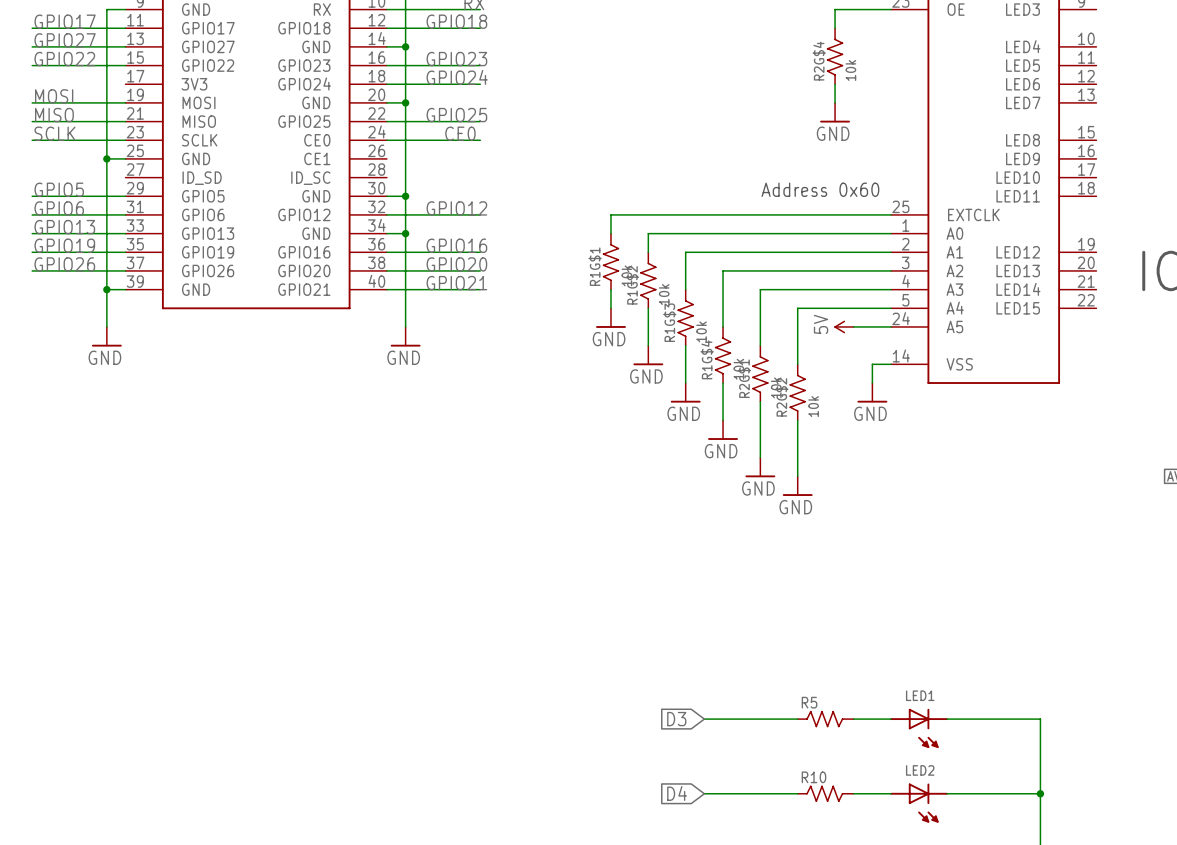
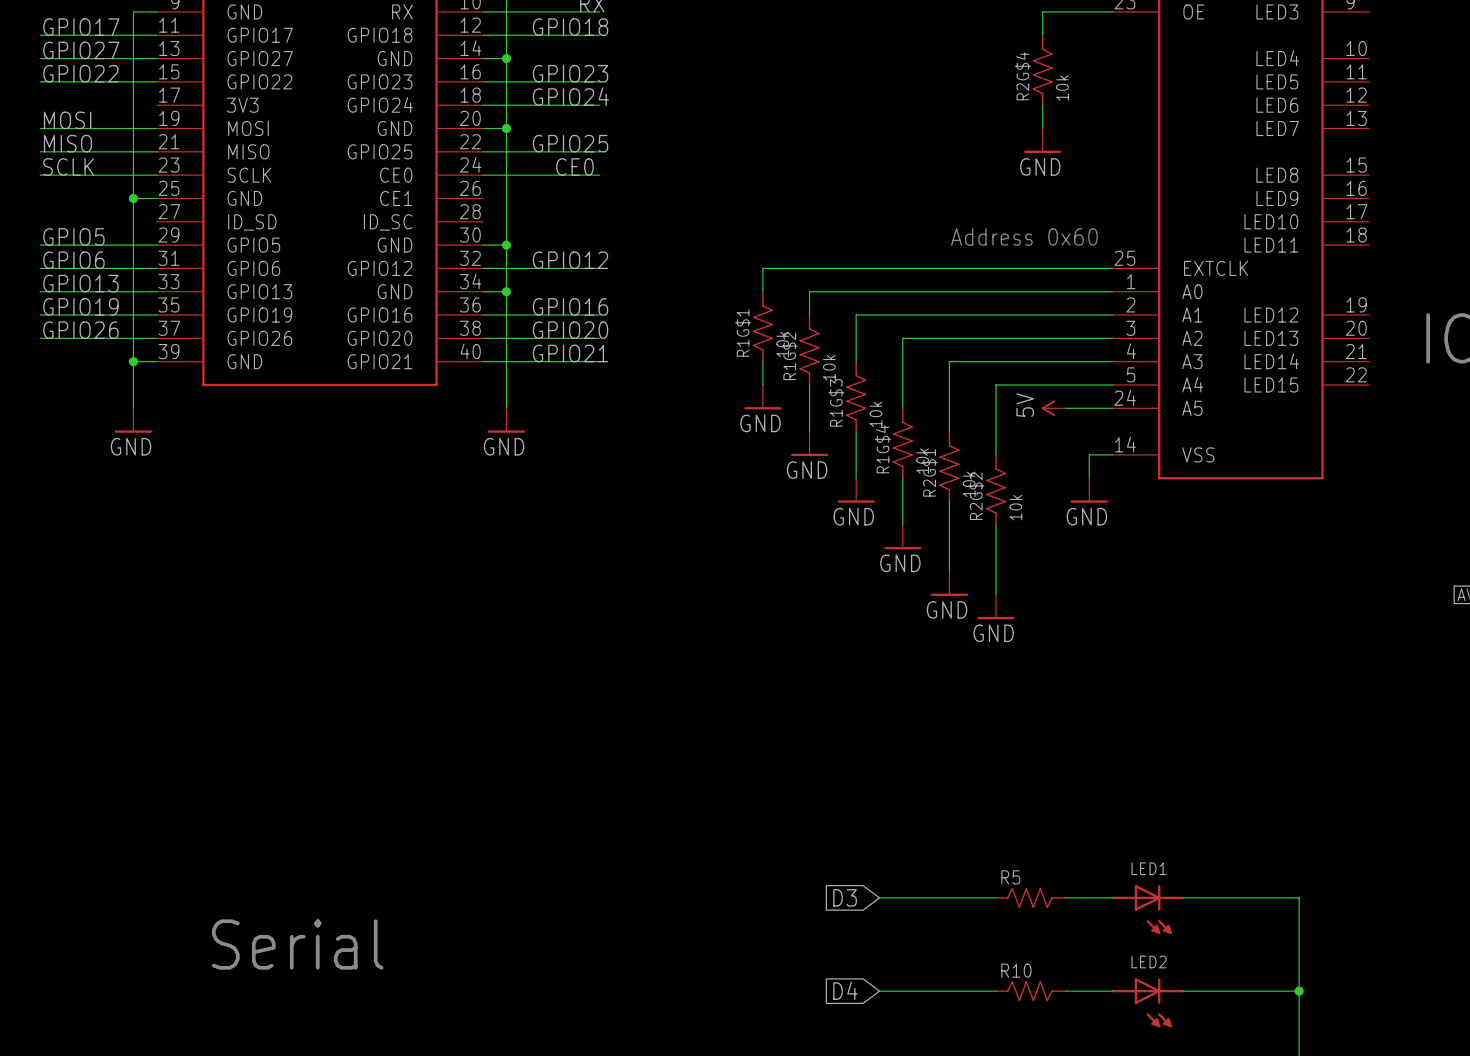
text: none -> Serial (297, 944)

